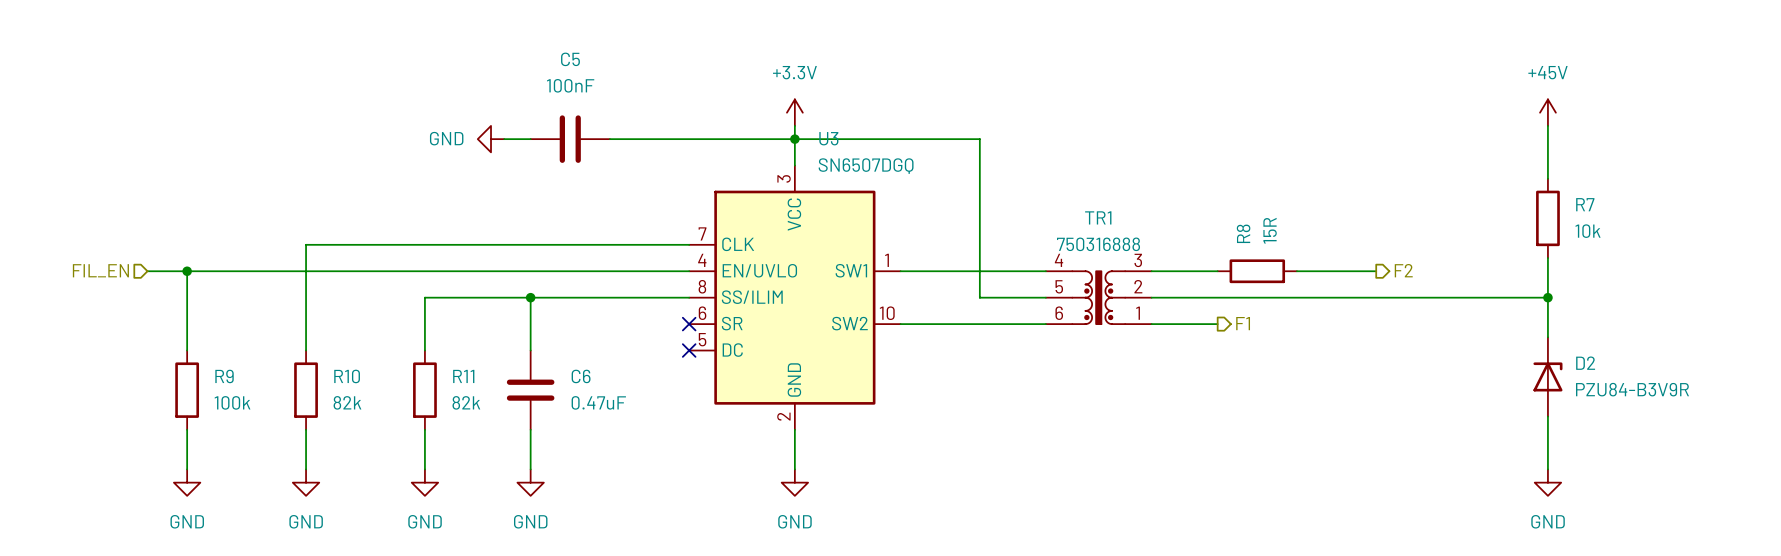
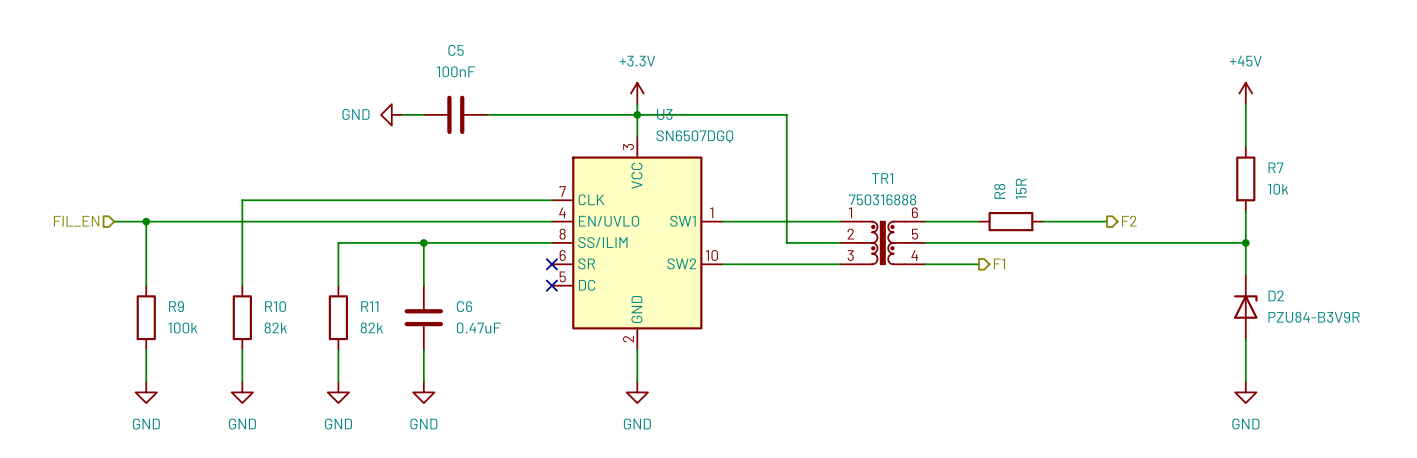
TR1 rotation: 0° (1098, 297) -> 180° (882, 242)

